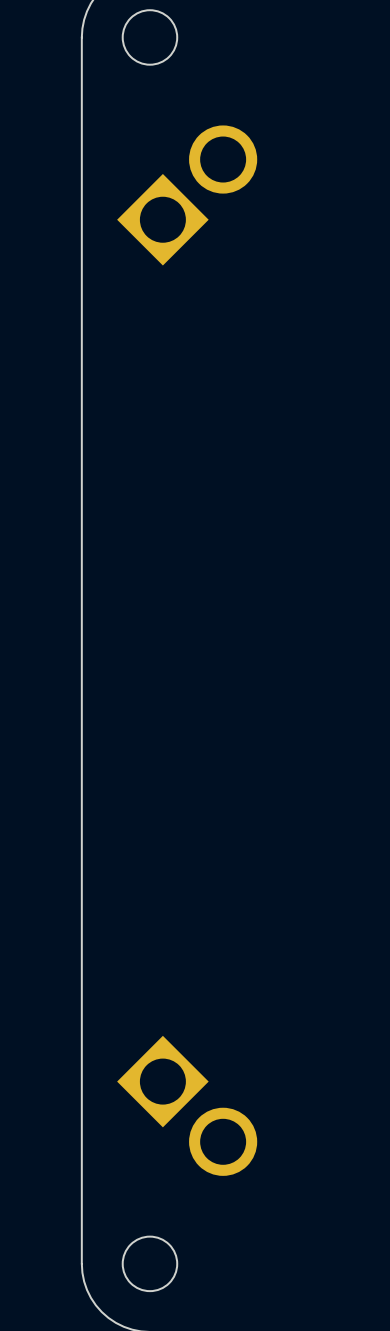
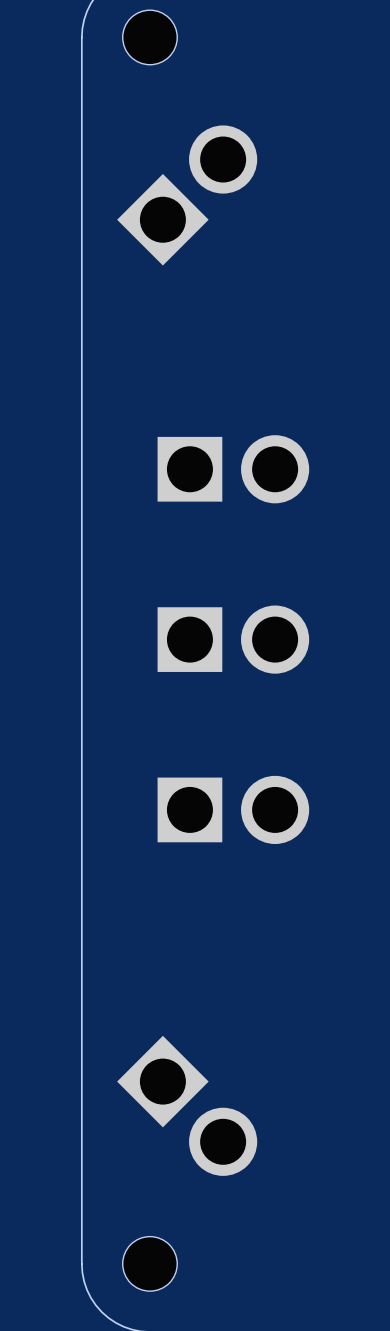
part: none -> (233, 469)
part: none -> (233, 639)
part: none -> (233, 809)

